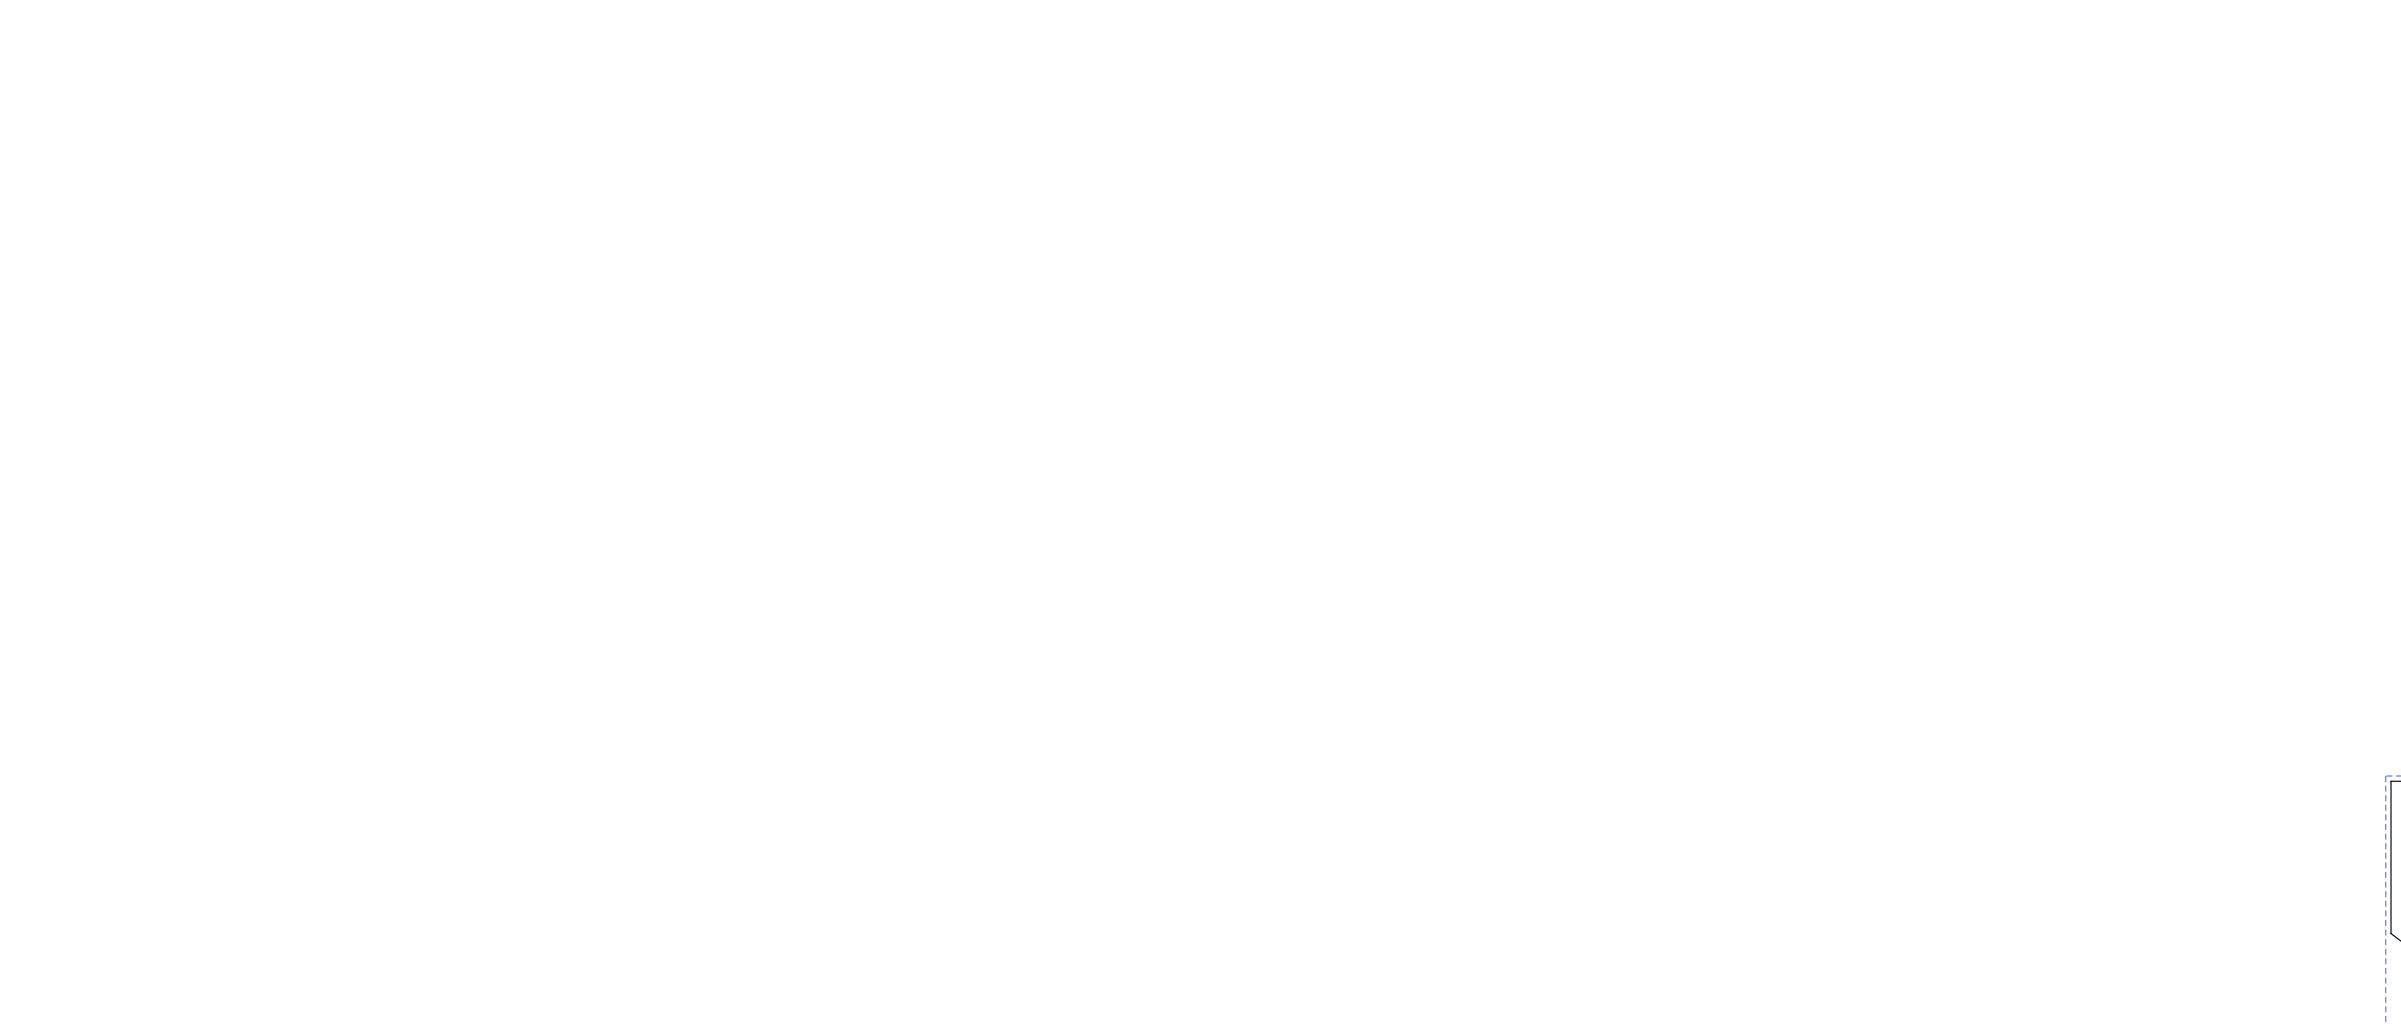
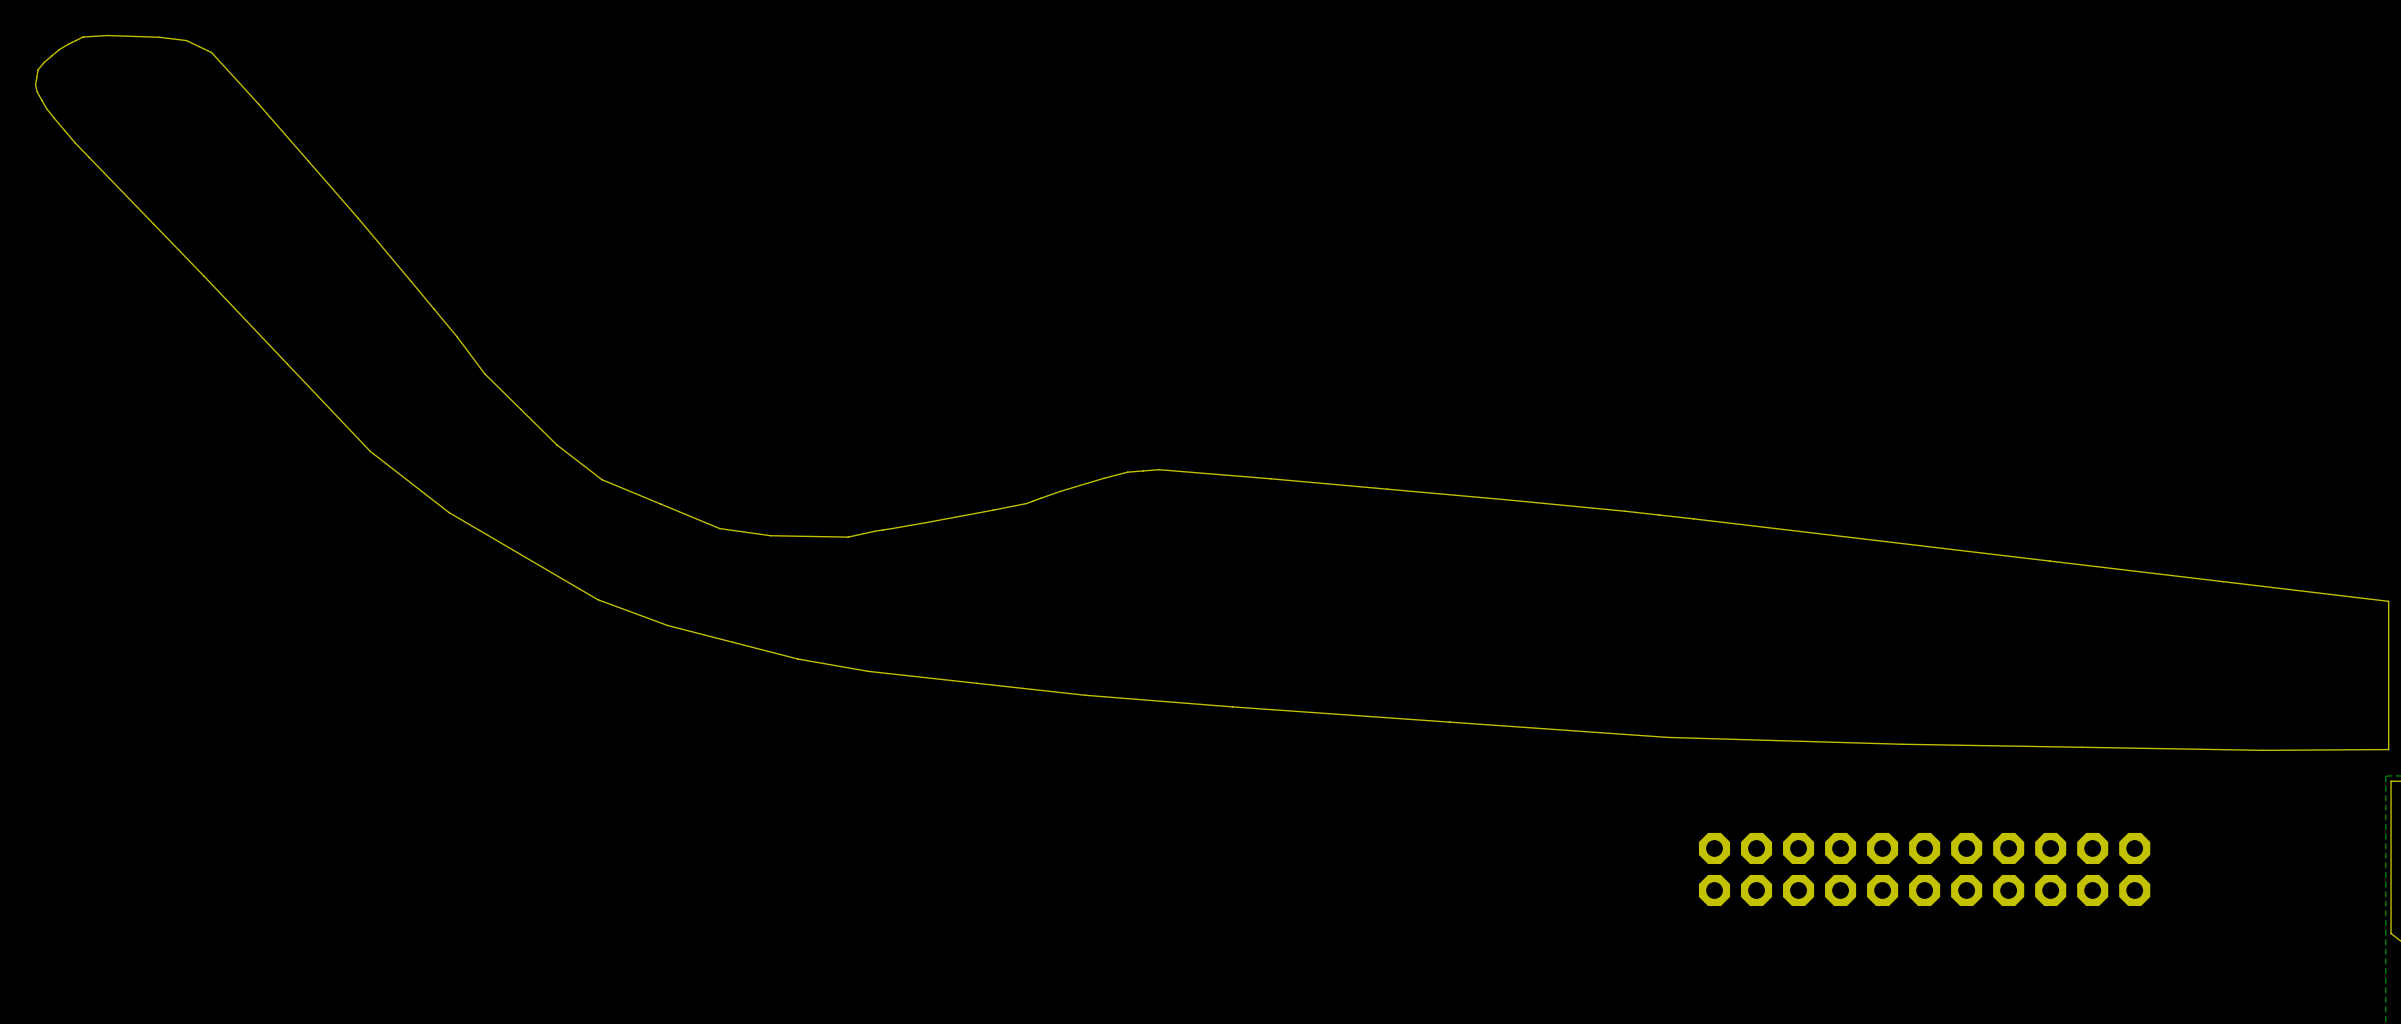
board edge: none -> (107, 35) (83, 37) (68, 44) (59, 49) (38, 69) (35, 84) (37, 92) (46, 108) (75, 143) (370, 451) (449, 512) (597, 599) (667, 625) (797, 658) (868, 671) (1085, 695) (1232, 706) (1667, 737) (1902, 744) (2262, 750) (2388, 749) (2388, 601) (1625, 511) (1159, 469) (1127, 472) (1060, 491) (1026, 503) (848, 537) (770, 535) (719, 528) (602, 479) (556, 445) (484, 373) (457, 337) (358, 218) (211, 52) (186, 40) (159, 37) (107, 35)
part: none -> (1924, 869)

